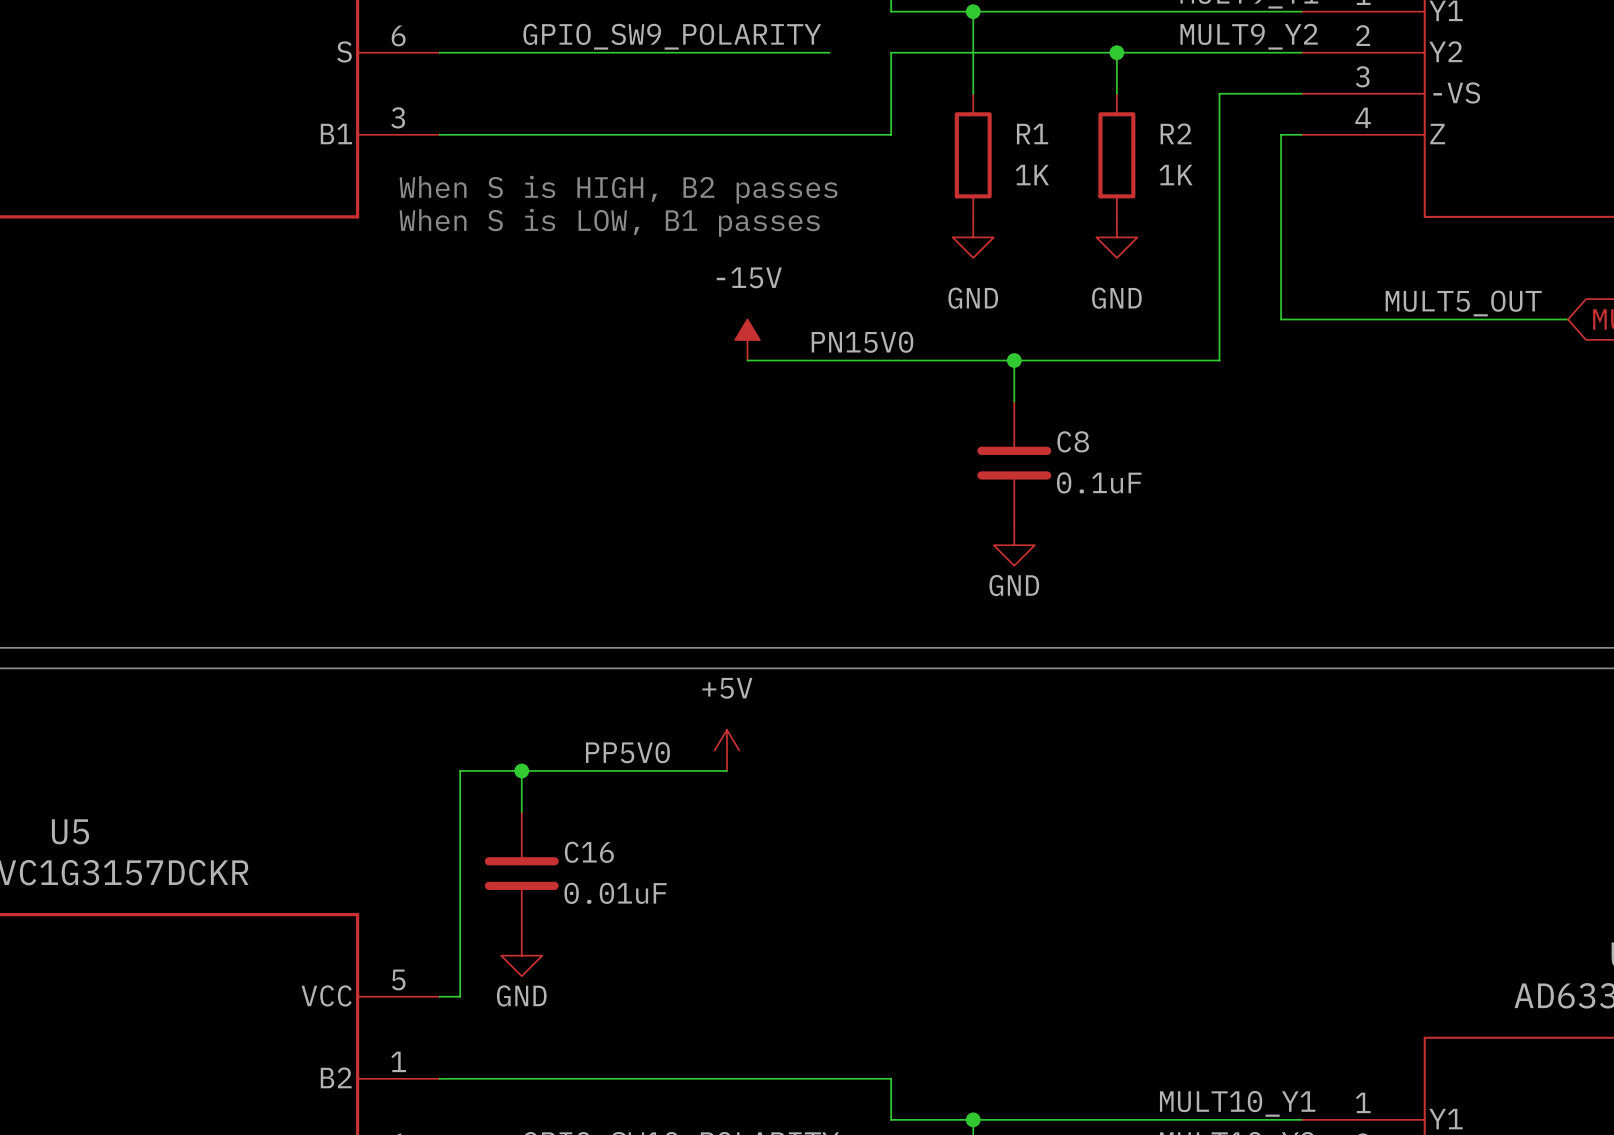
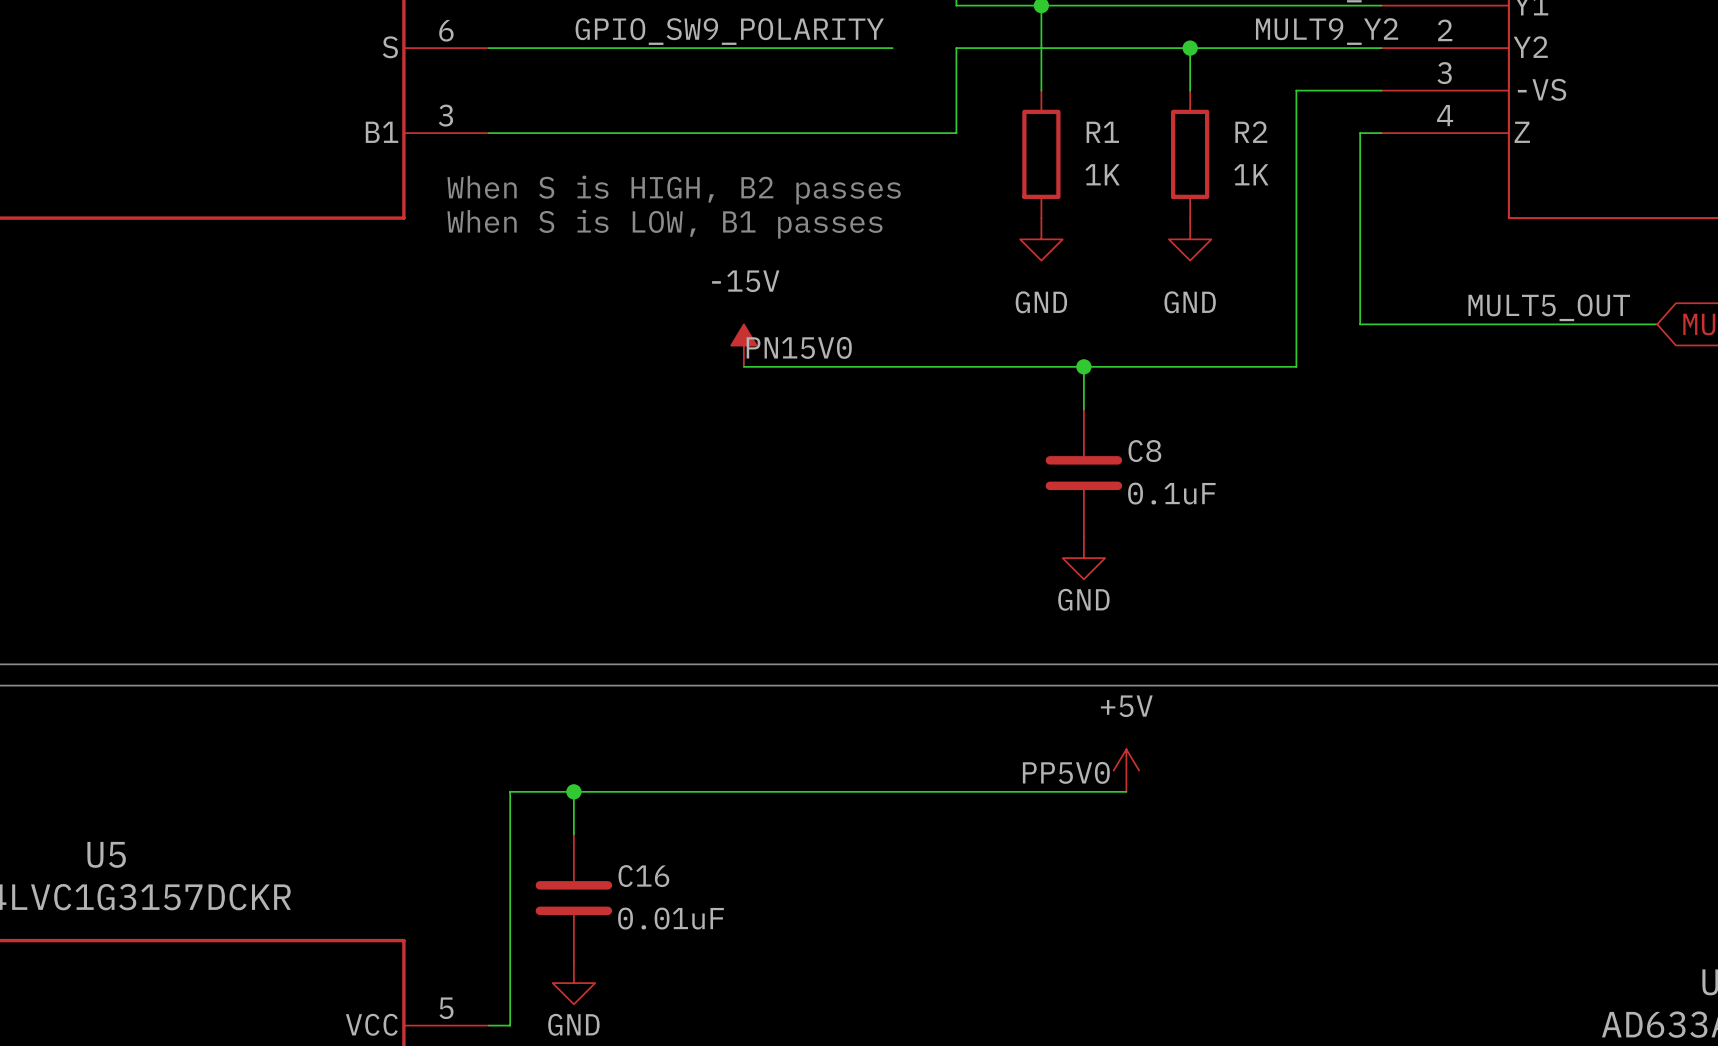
power symbol position: -15V (747, 340) -> -15V (743, 345)
label position: PN15V0 (862, 342) -> PN15V0 (799, 347)
wire: none -> (743, 366) (807, 366)
power symbol position: +5V (726, 750) -> +5V (1126, 770)
label position: PP5V0 (627, 752) -> PP5V0 (1066, 772)
wire: none -> (786, 791) (1126, 791)

